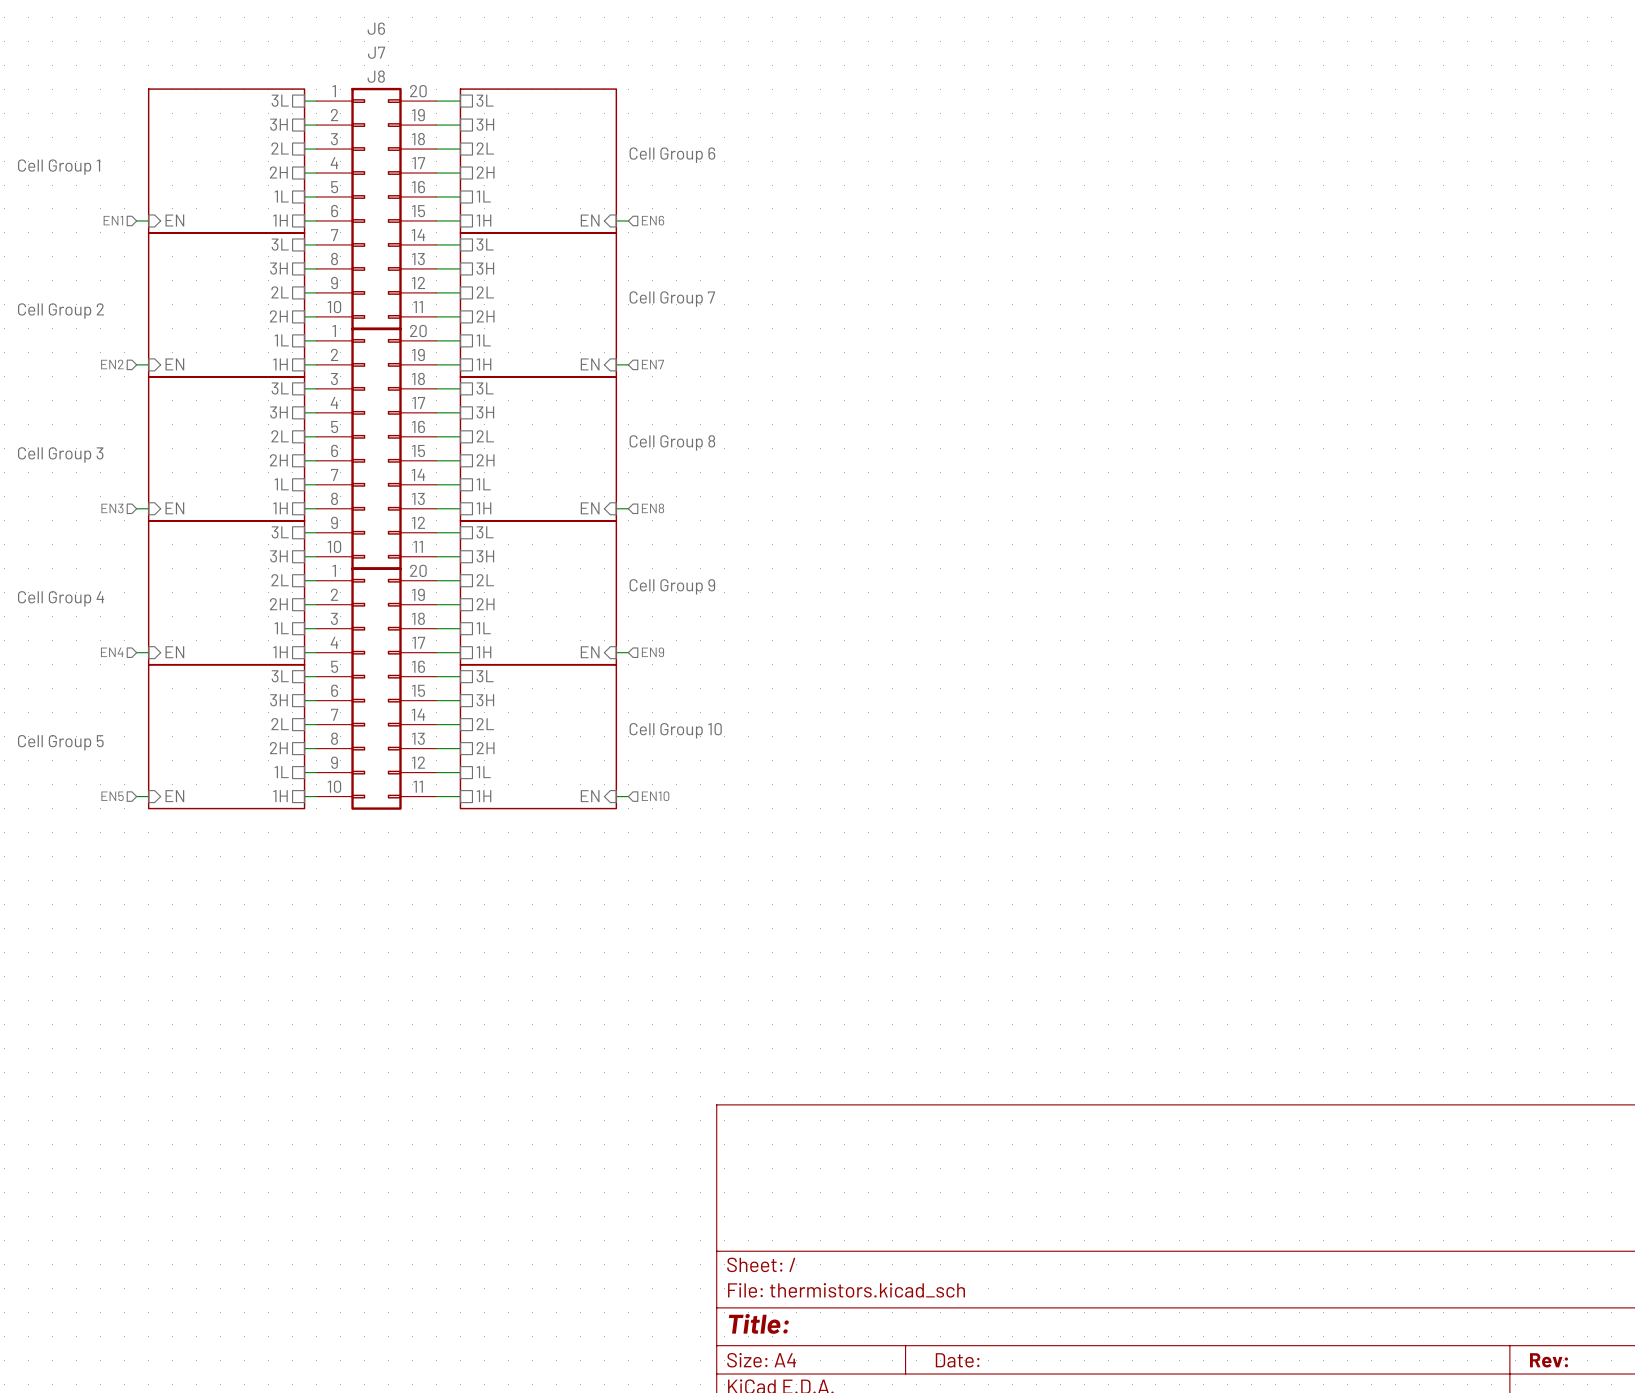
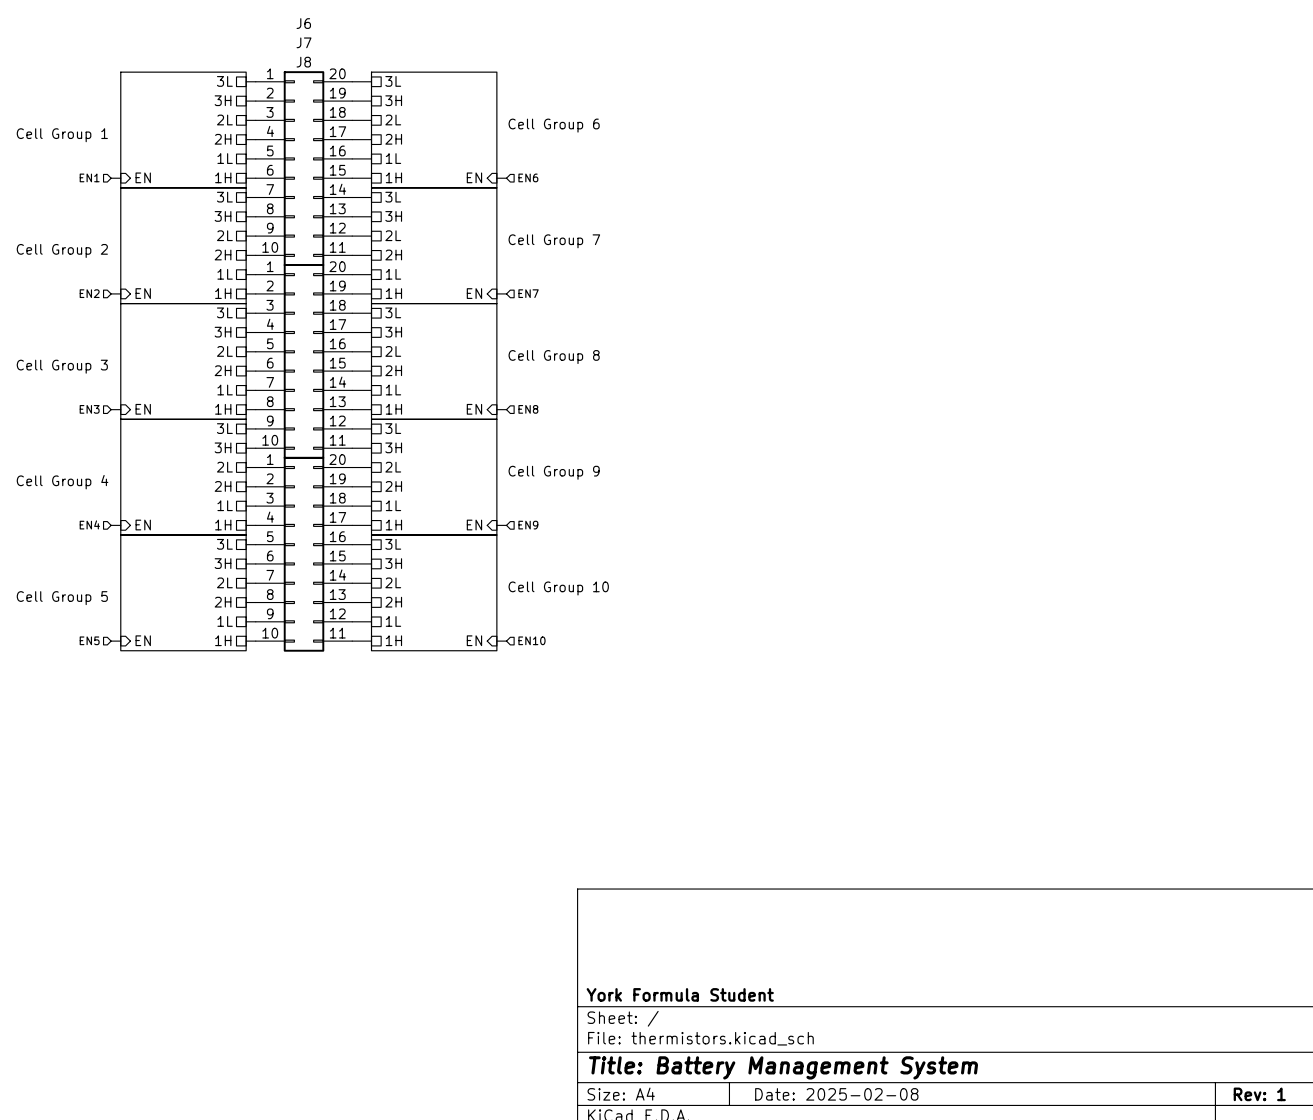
title block: none -> York Formula Student (680, 994)
title block: Title: (758, 1323) -> Title: Battery Management System (783, 1067)
title block: Date: (957, 1360) -> Date: 2025-02-08 (836, 1094)
title block: Rev: (1549, 1360) -> Rev: 1 (1259, 1094)

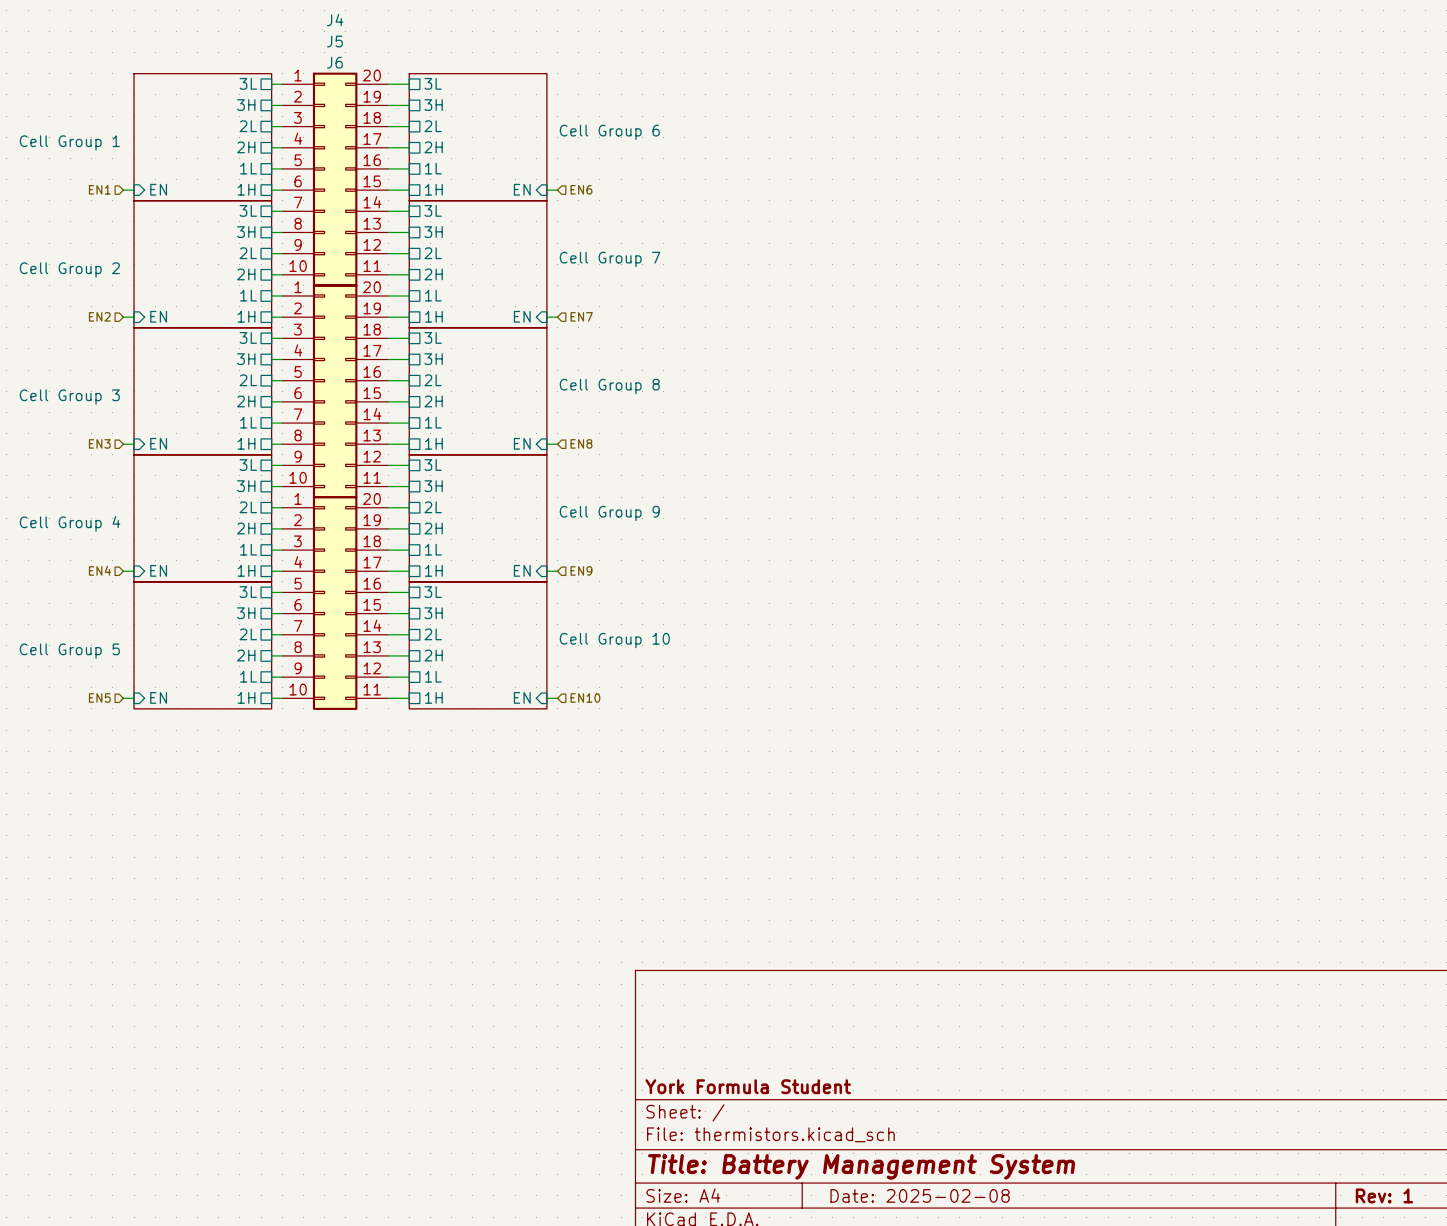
J6 name: J6 (303, 23) -> J4 (335, 20)
J7 name: J7 (304, 42) -> J5 (334, 41)
J8 name: J8 (303, 62) -> J6 (334, 62)

